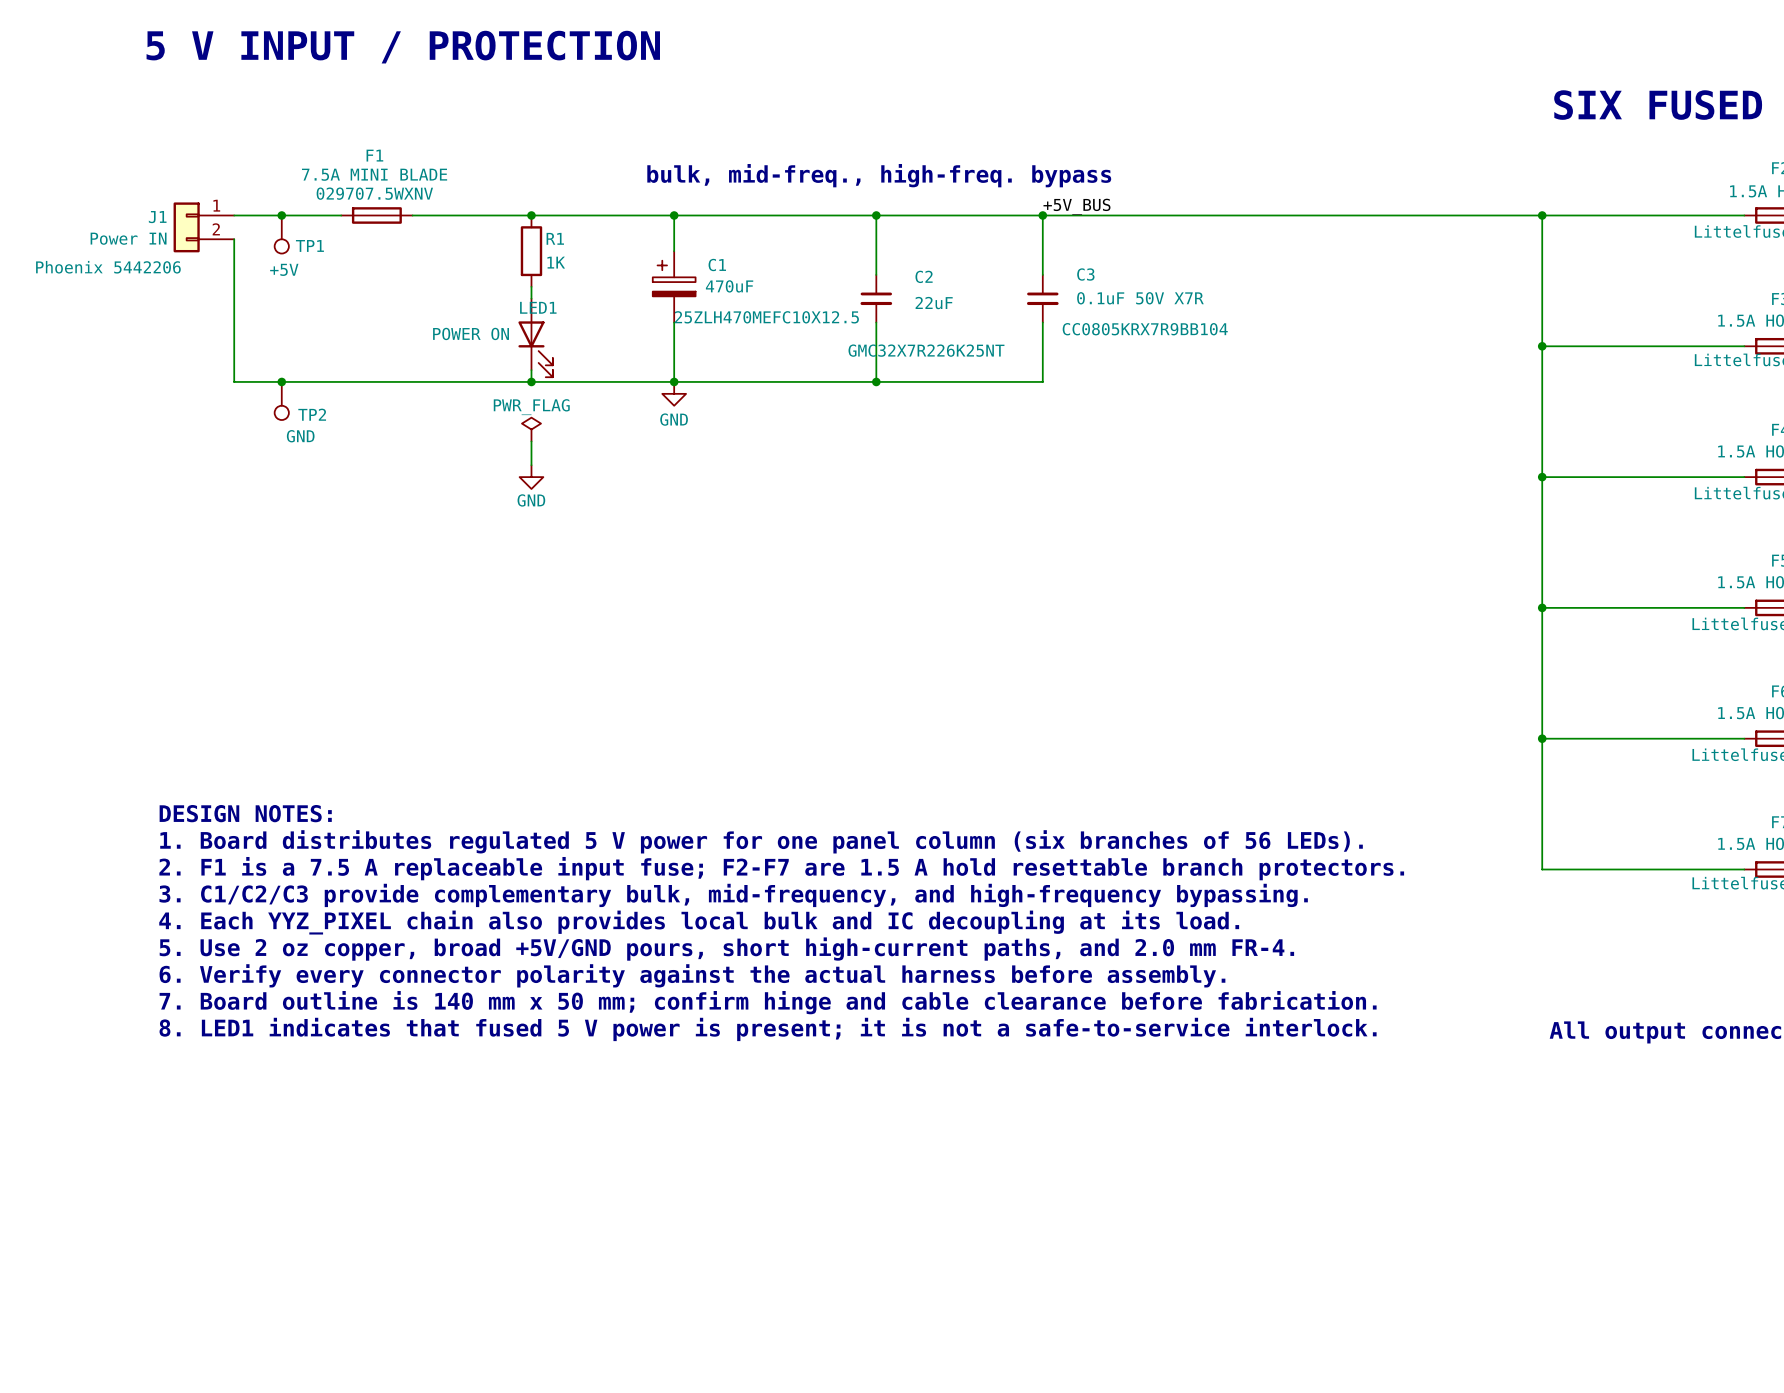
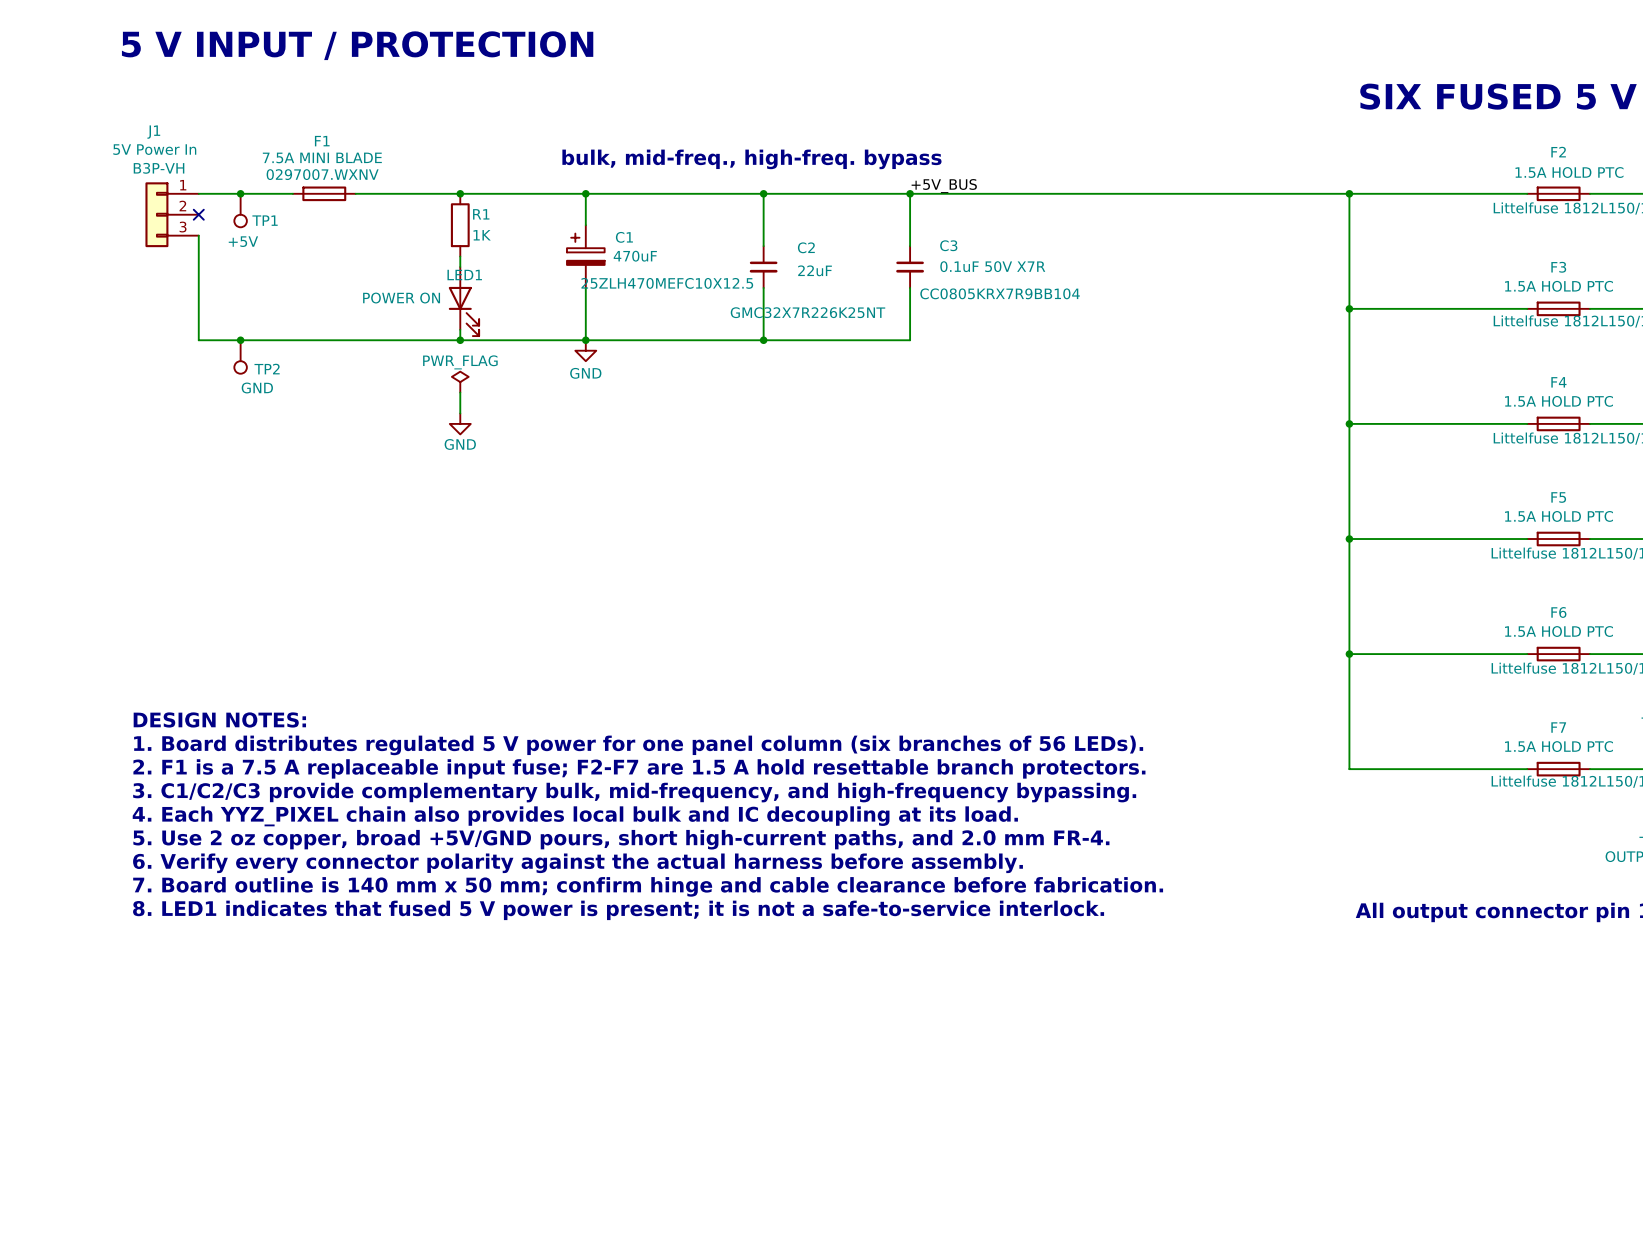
F1 text: 029707.5WXNV (374, 193) -> 0297007.WXNV (322, 174)
J1 symbol: [173, 202, 235, 253] -> [145, 182, 199, 248]
J1 name position: J1 (157, 217) -> J1 (153, 132)
J1 value: Power IN (128, 238) -> 5V Power In (154, 149)
wire: (234, 239) (234, 263) -> none
no-connect mark: none -> (198, 214)
J1 text: Phoenix 5442206 (108, 267) -> B3P-VH (159, 168)

